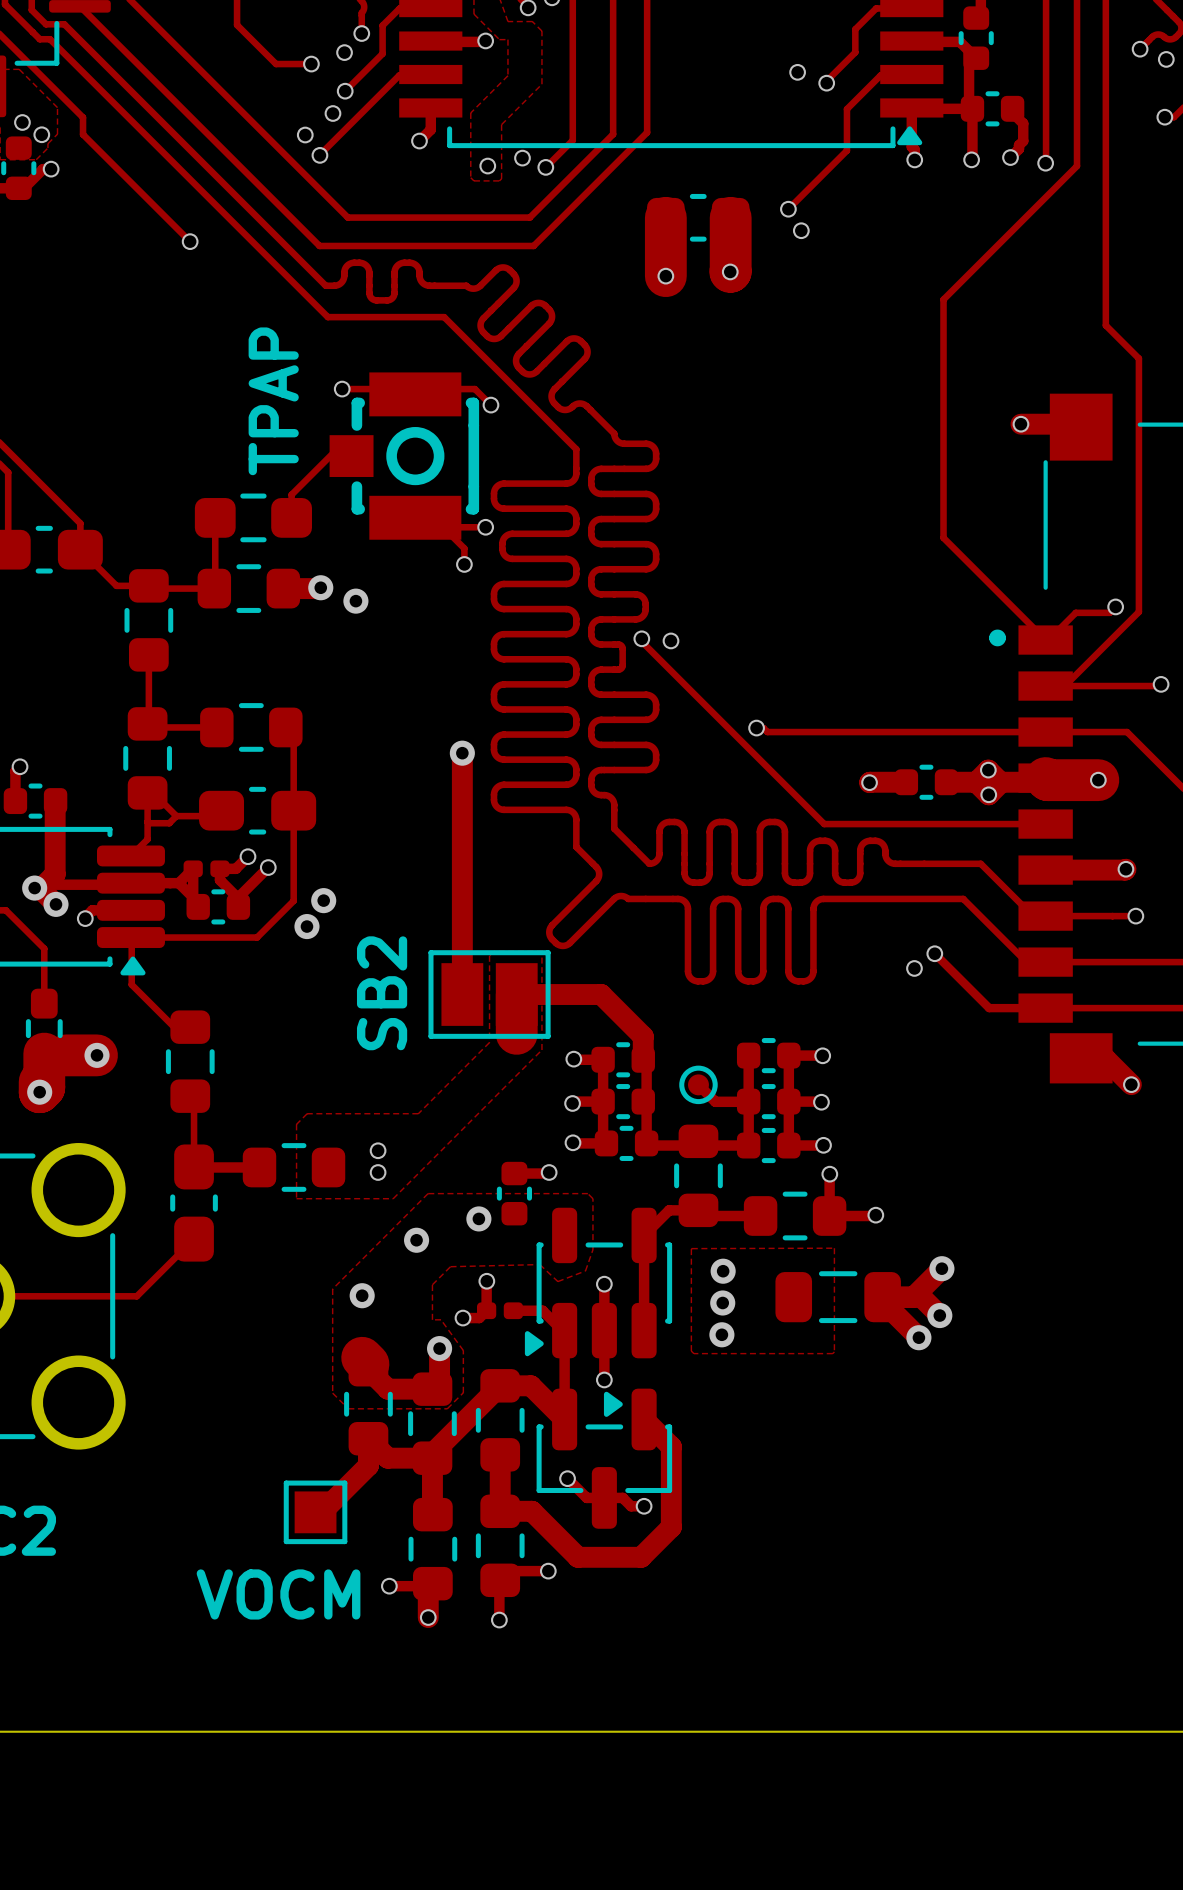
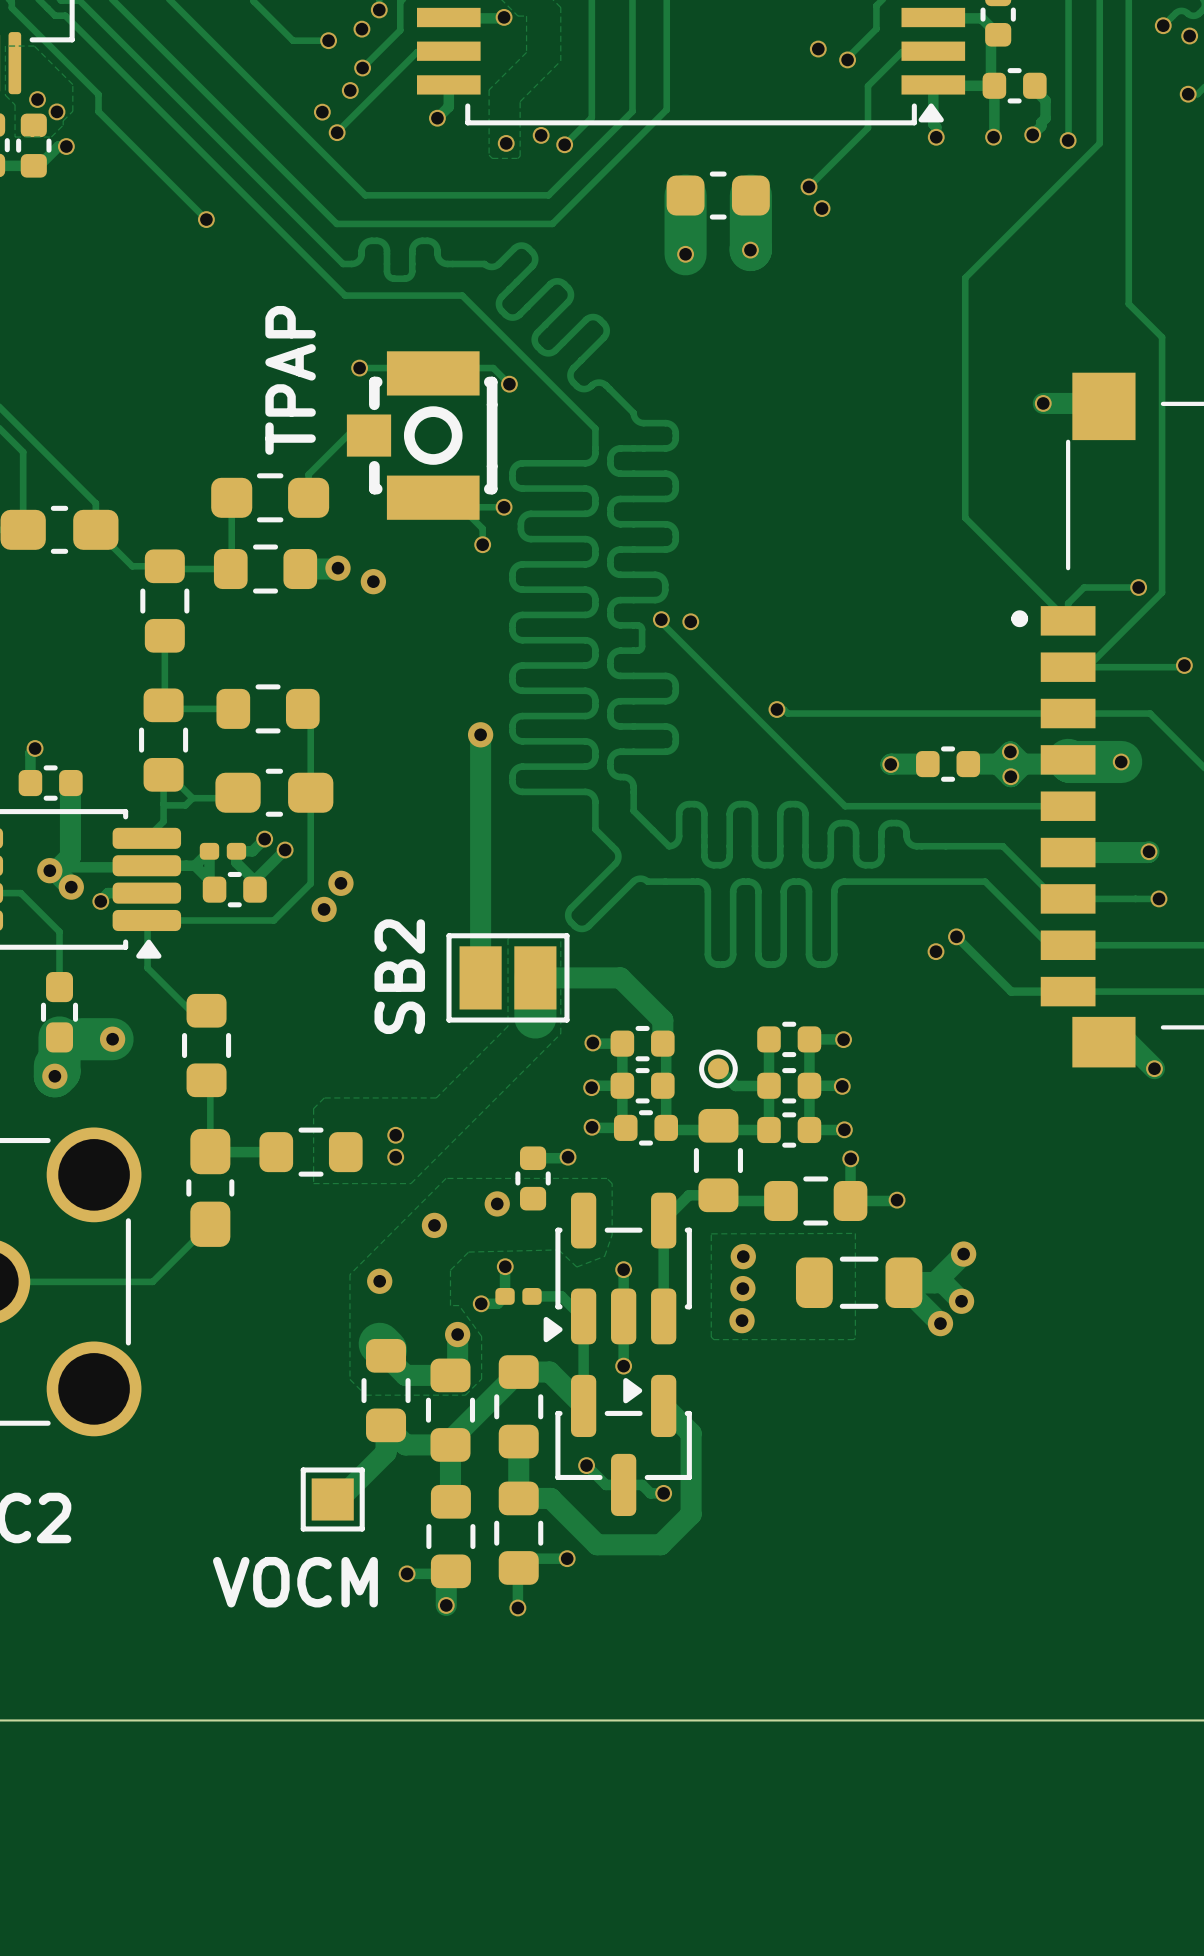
track: (1115, 606) (1109, 612) (1075, 612) (1050, 637) -> (1138, 587) (1084, 587) (1068, 603) (1068, 620)

